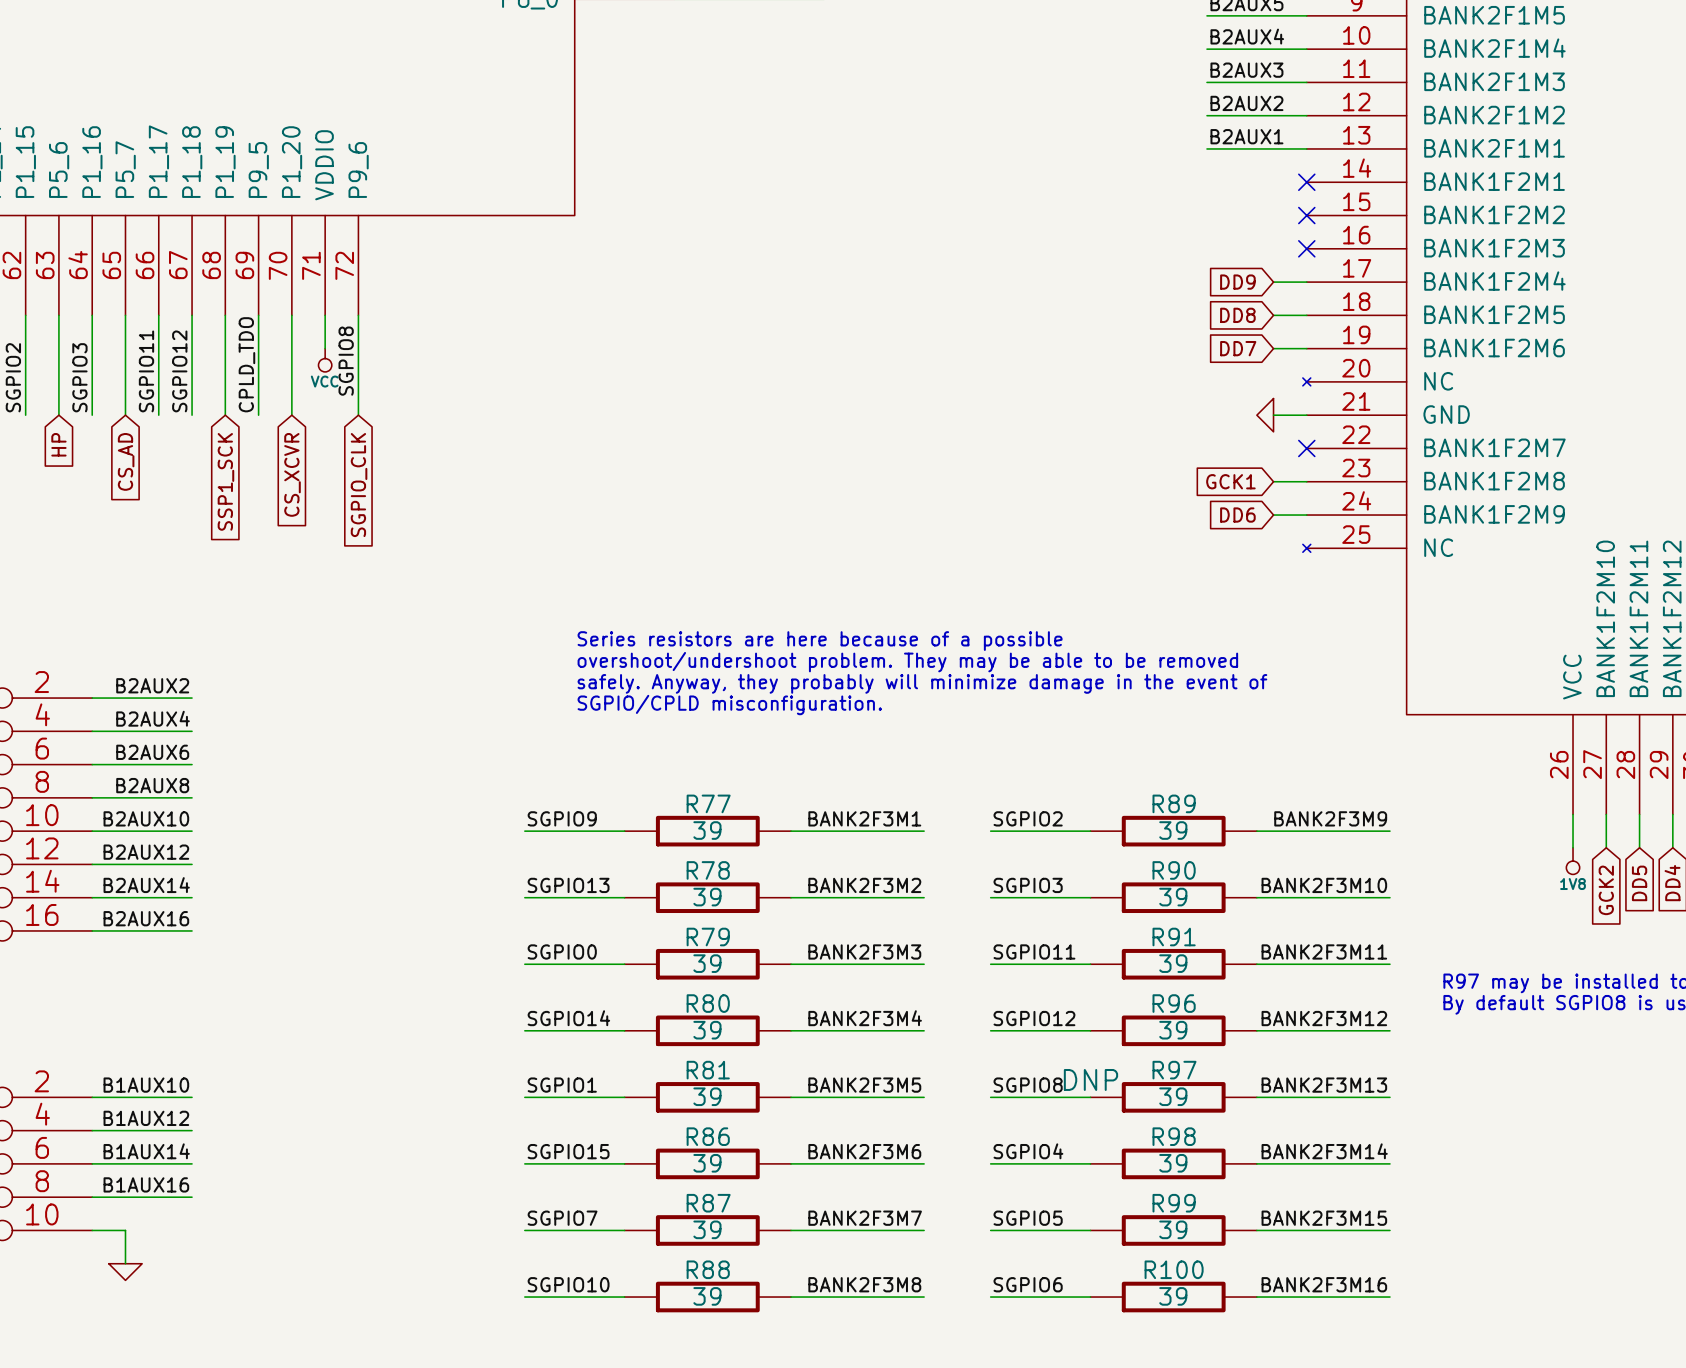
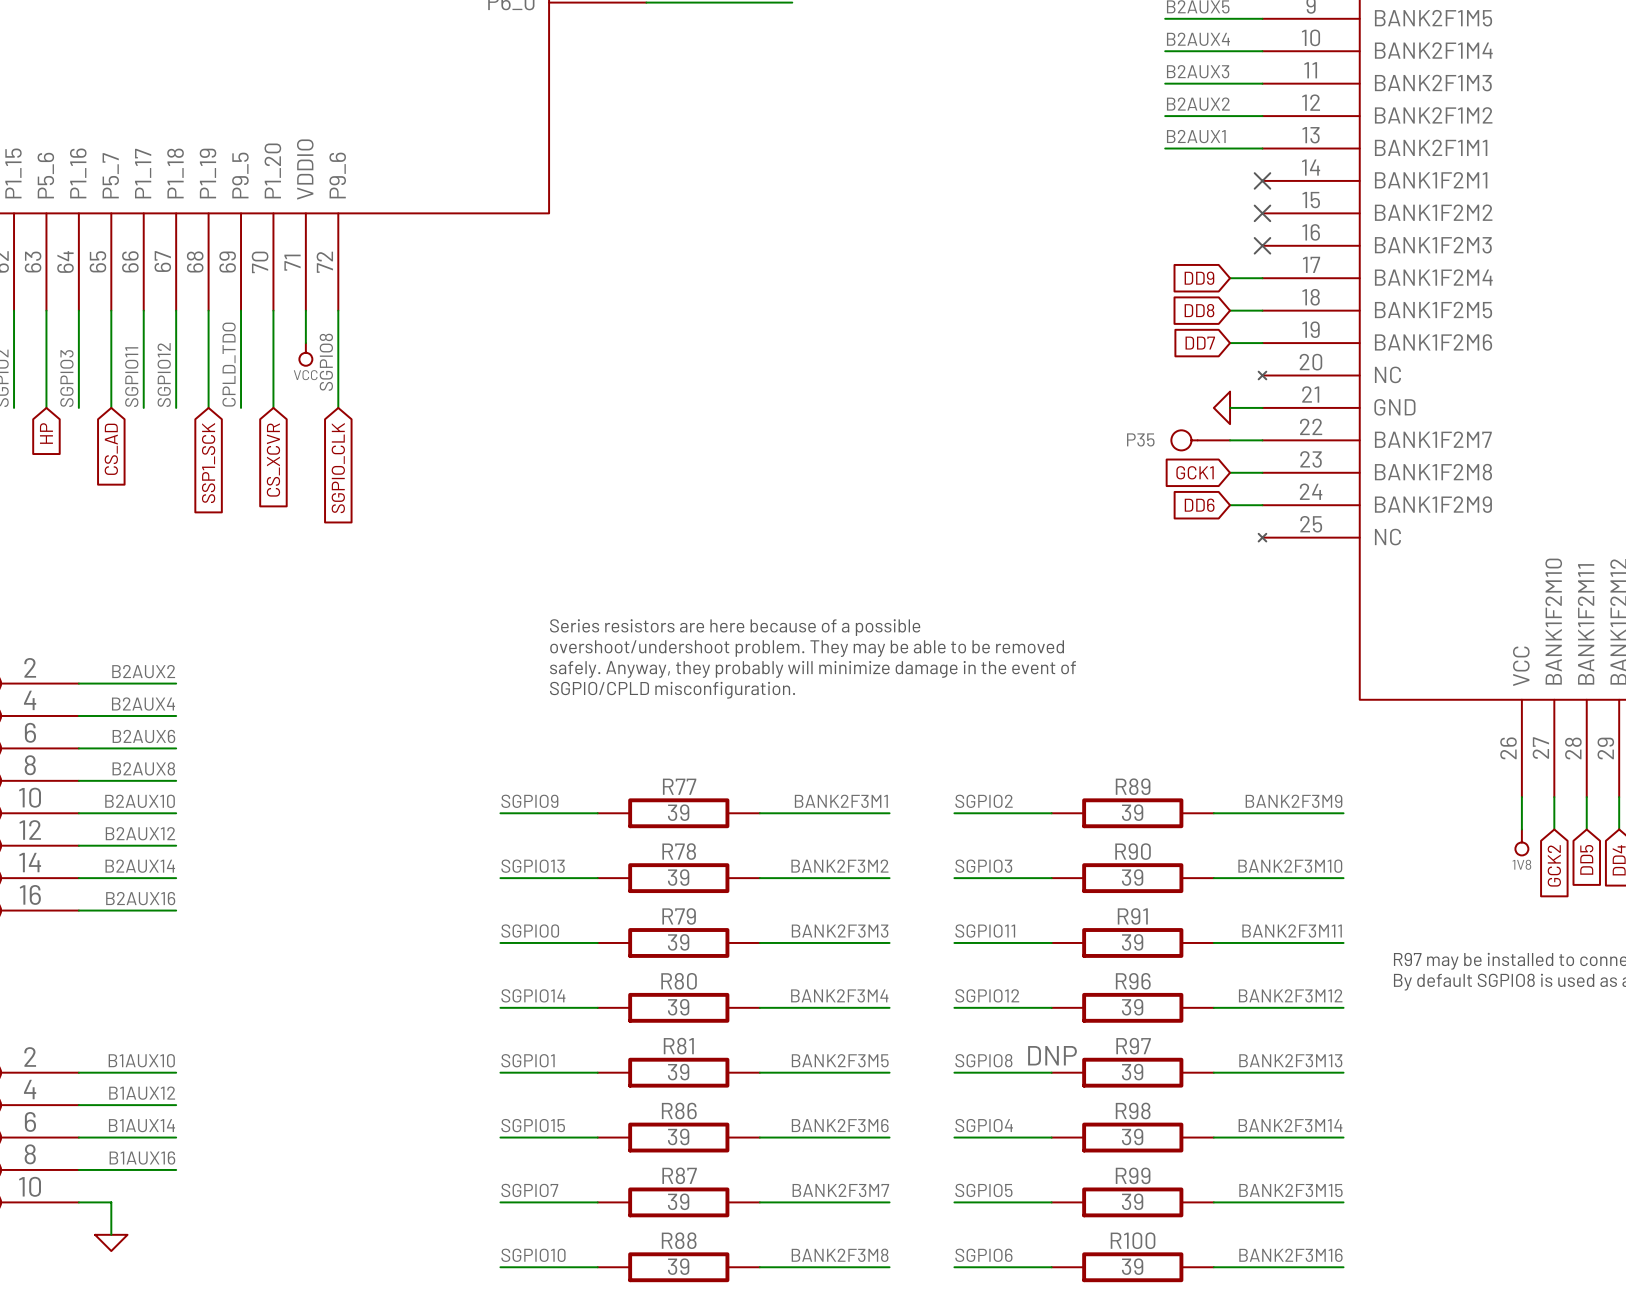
P35: none -> (1200, 440)
wire: none -> (1230, 440) (1262, 440)
no-connect mark: (1306, 448) -> none

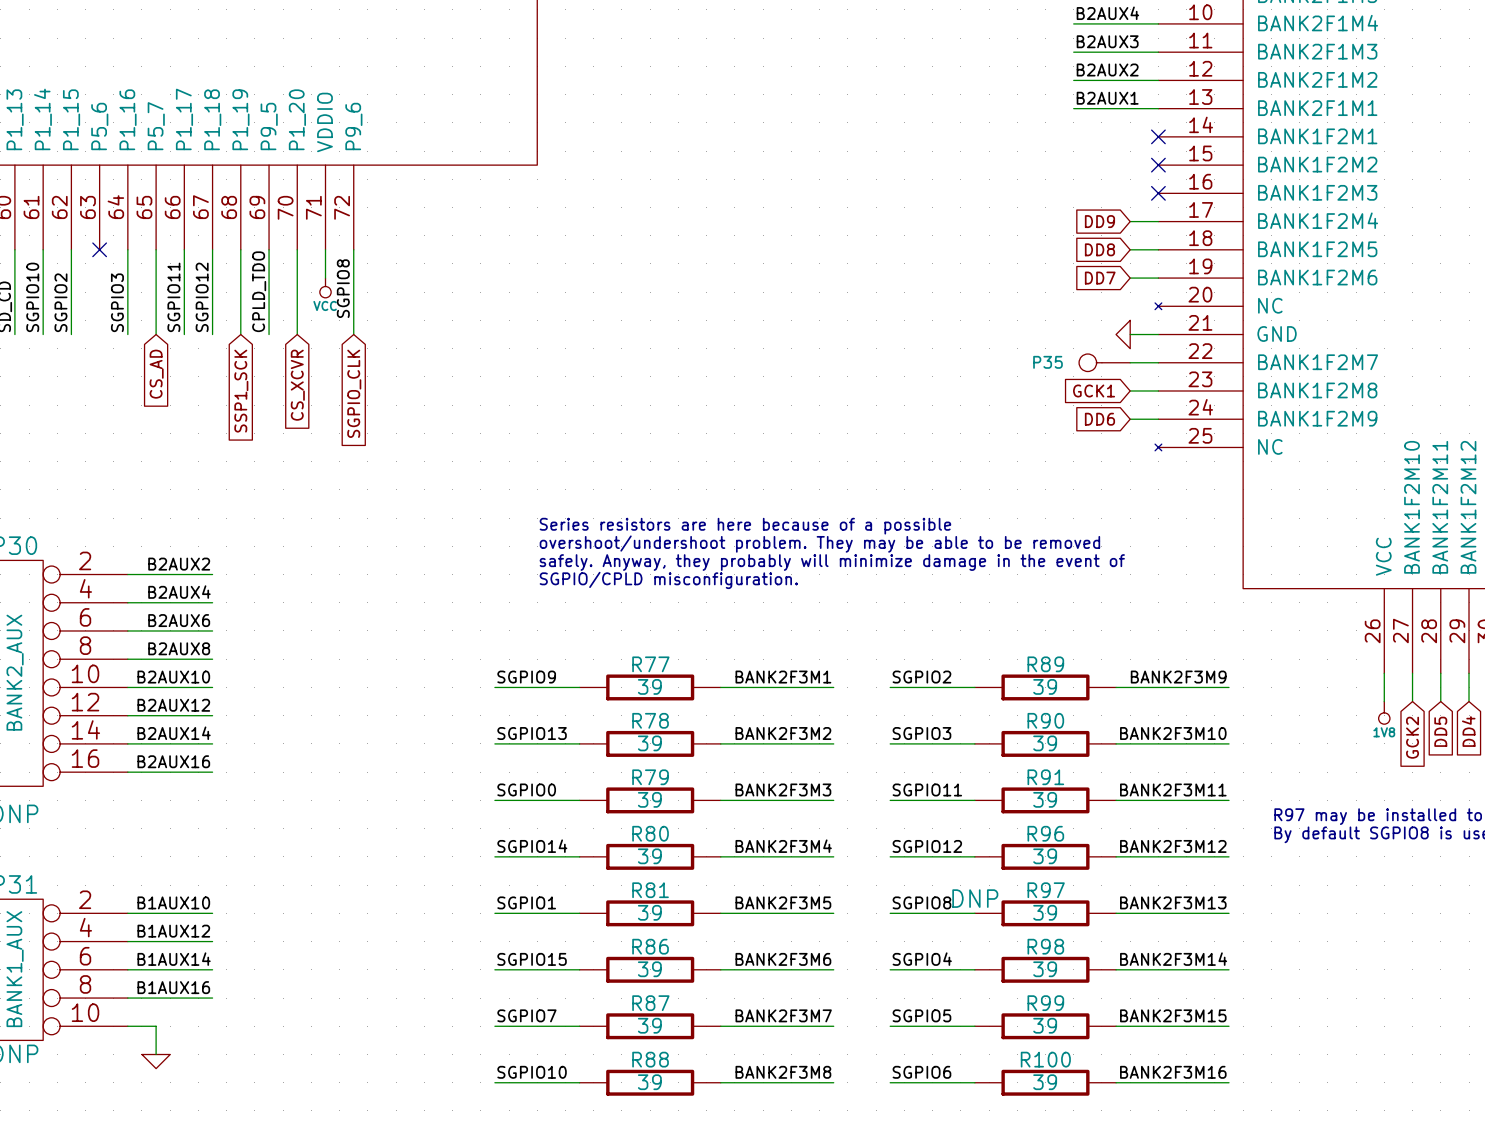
wire: (46, 310) (46, 407) -> none
no-connect mark: none -> (99, 249)
global label: HP (46, 433) -> none

